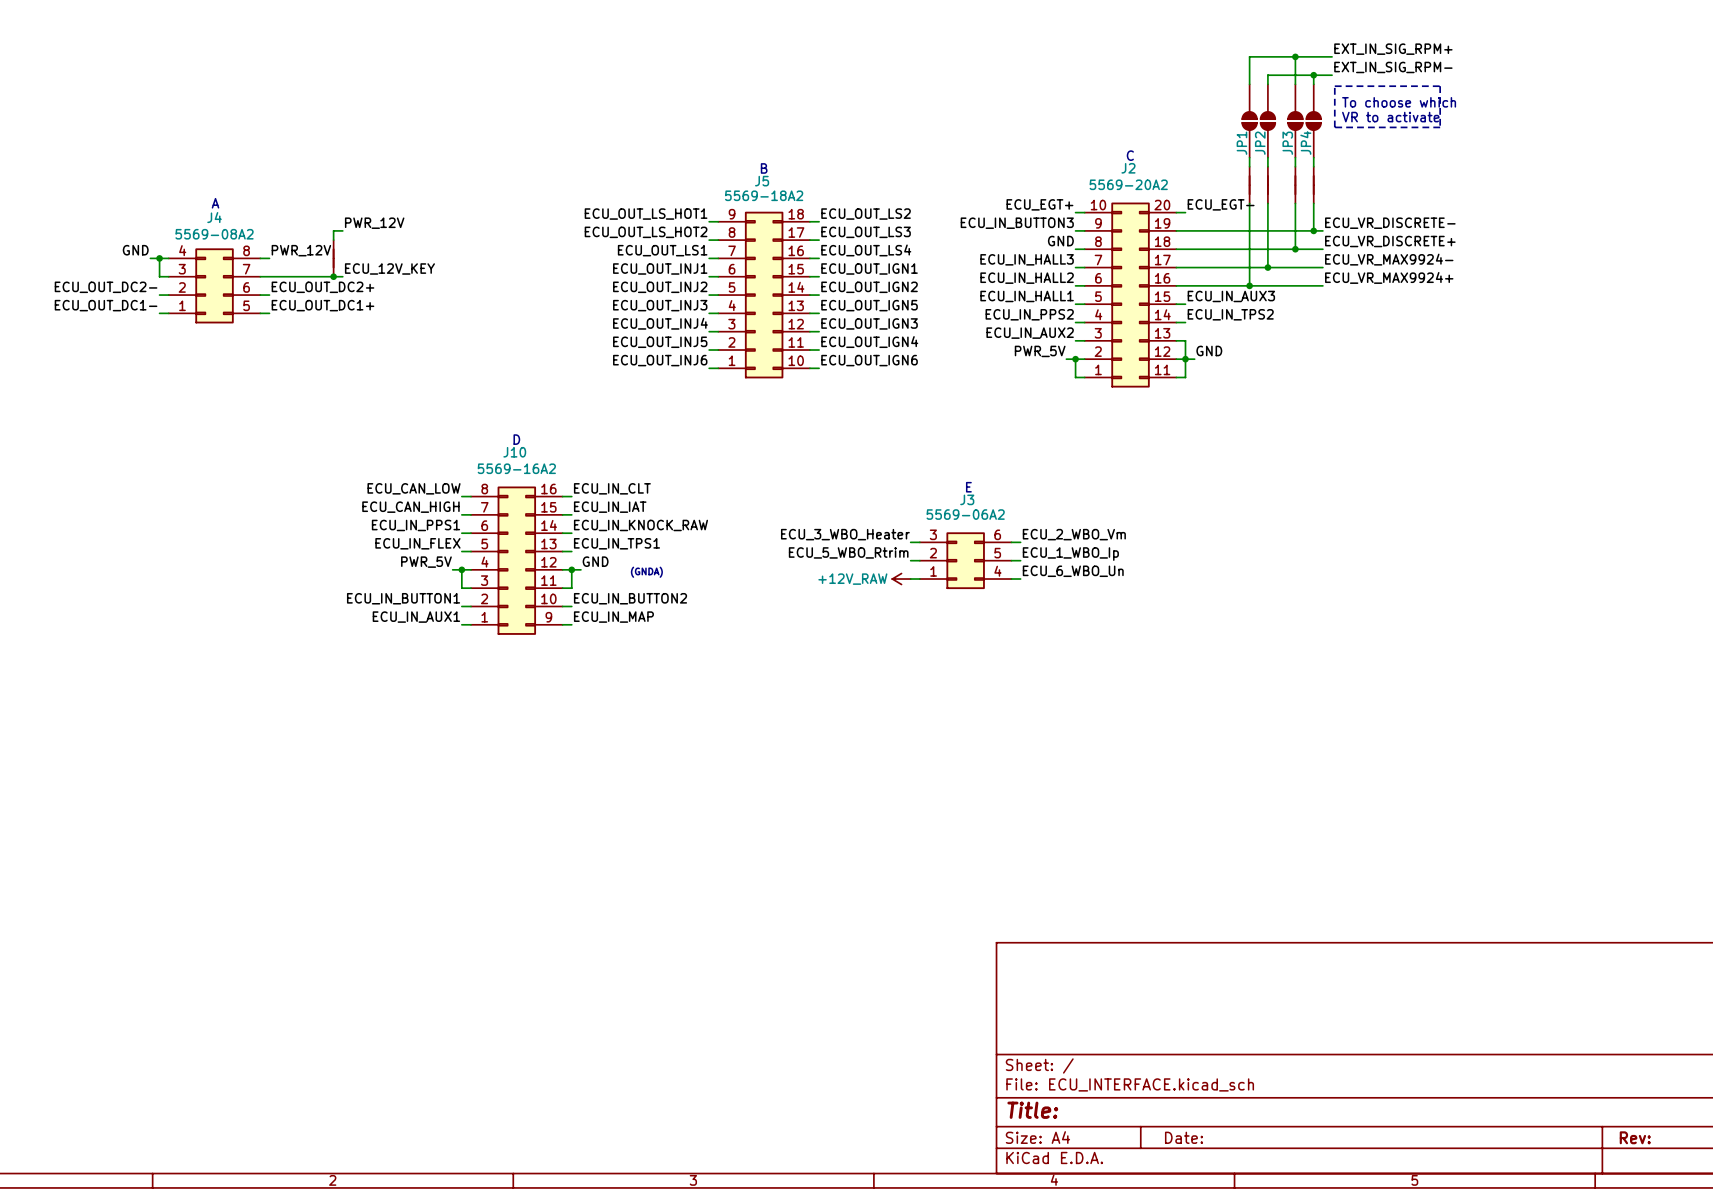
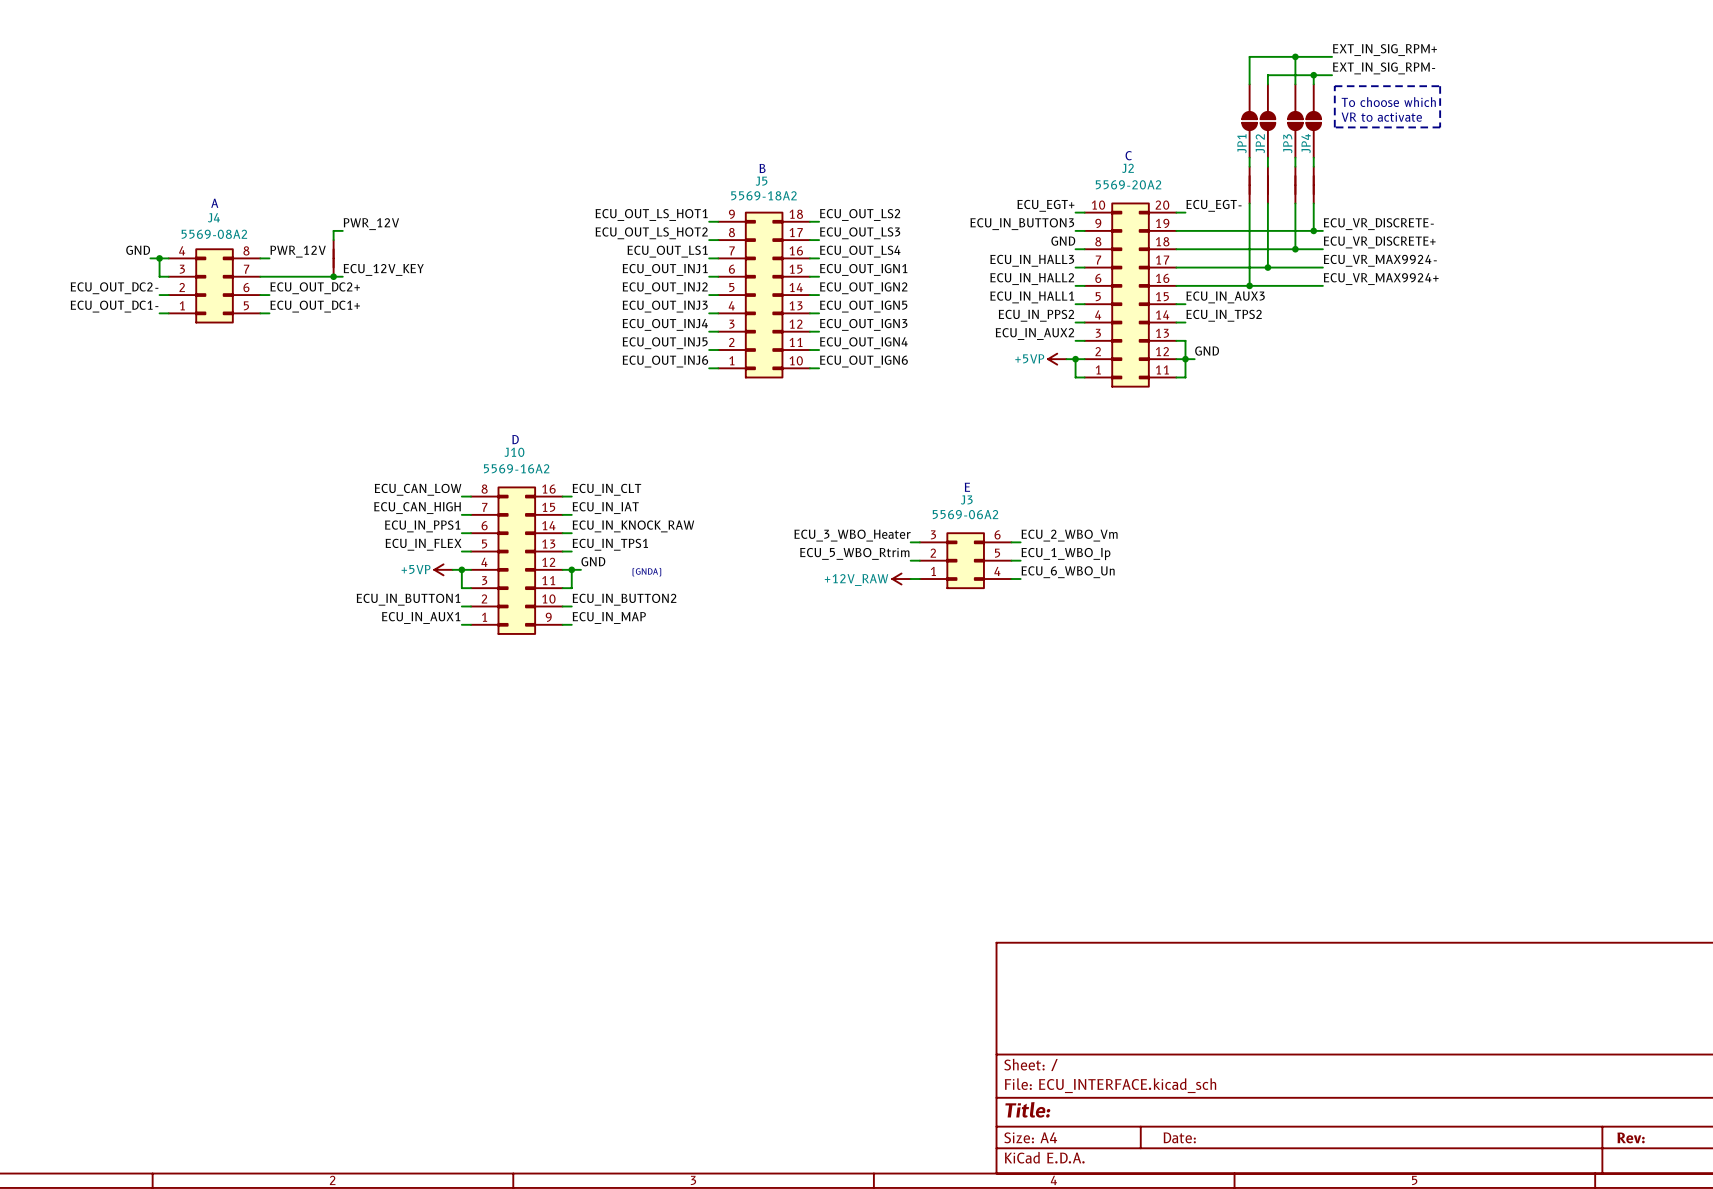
label: PWR_5V (1040, 351) -> none
power symbol: none -> +5VP (1057, 359)
label: PWR_5V (426, 562) -> none
power symbol: none -> +5VP (443, 569)

